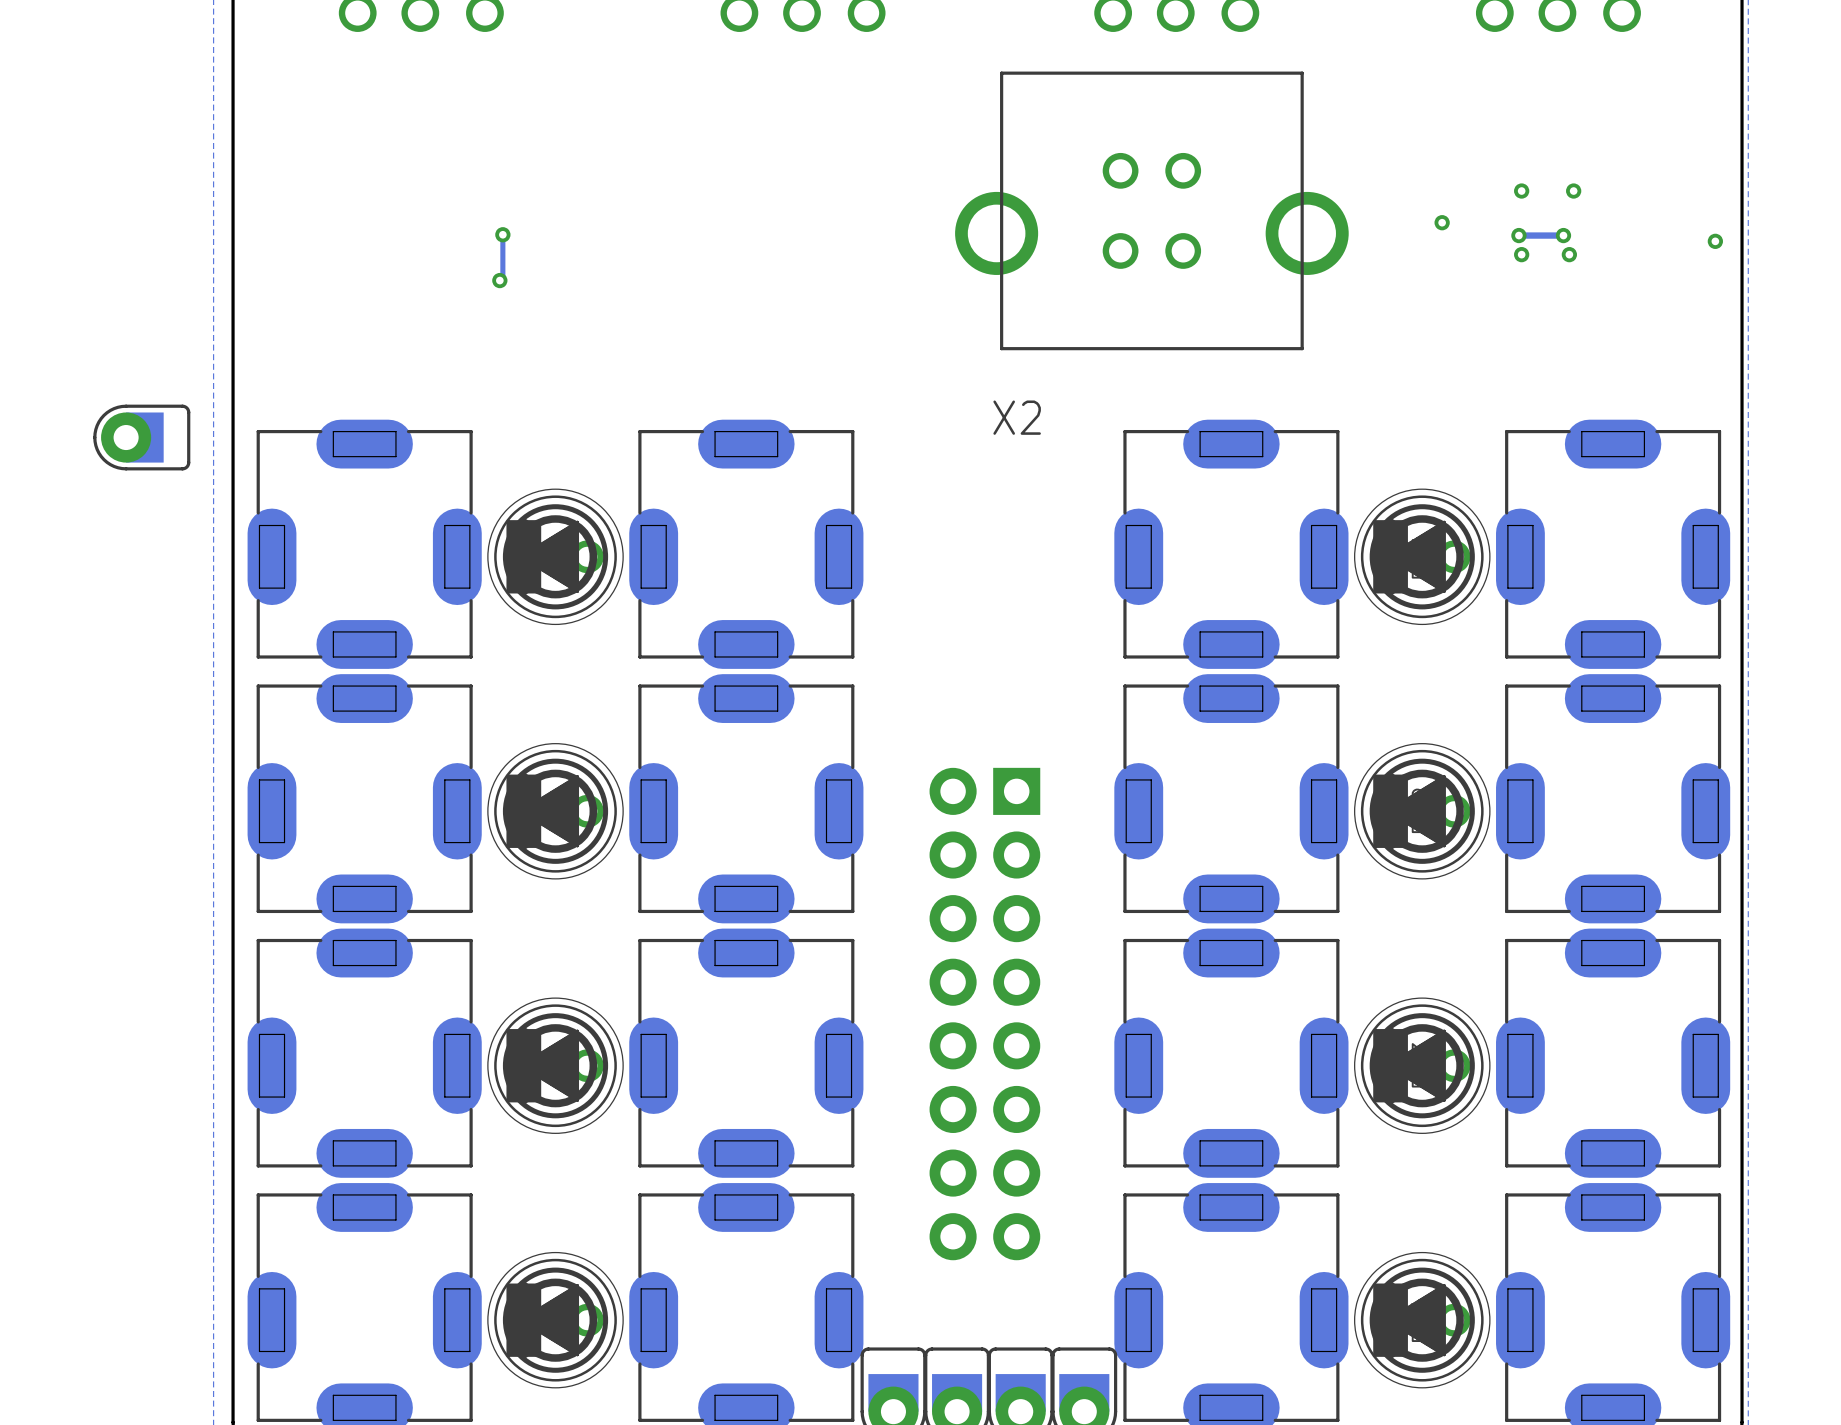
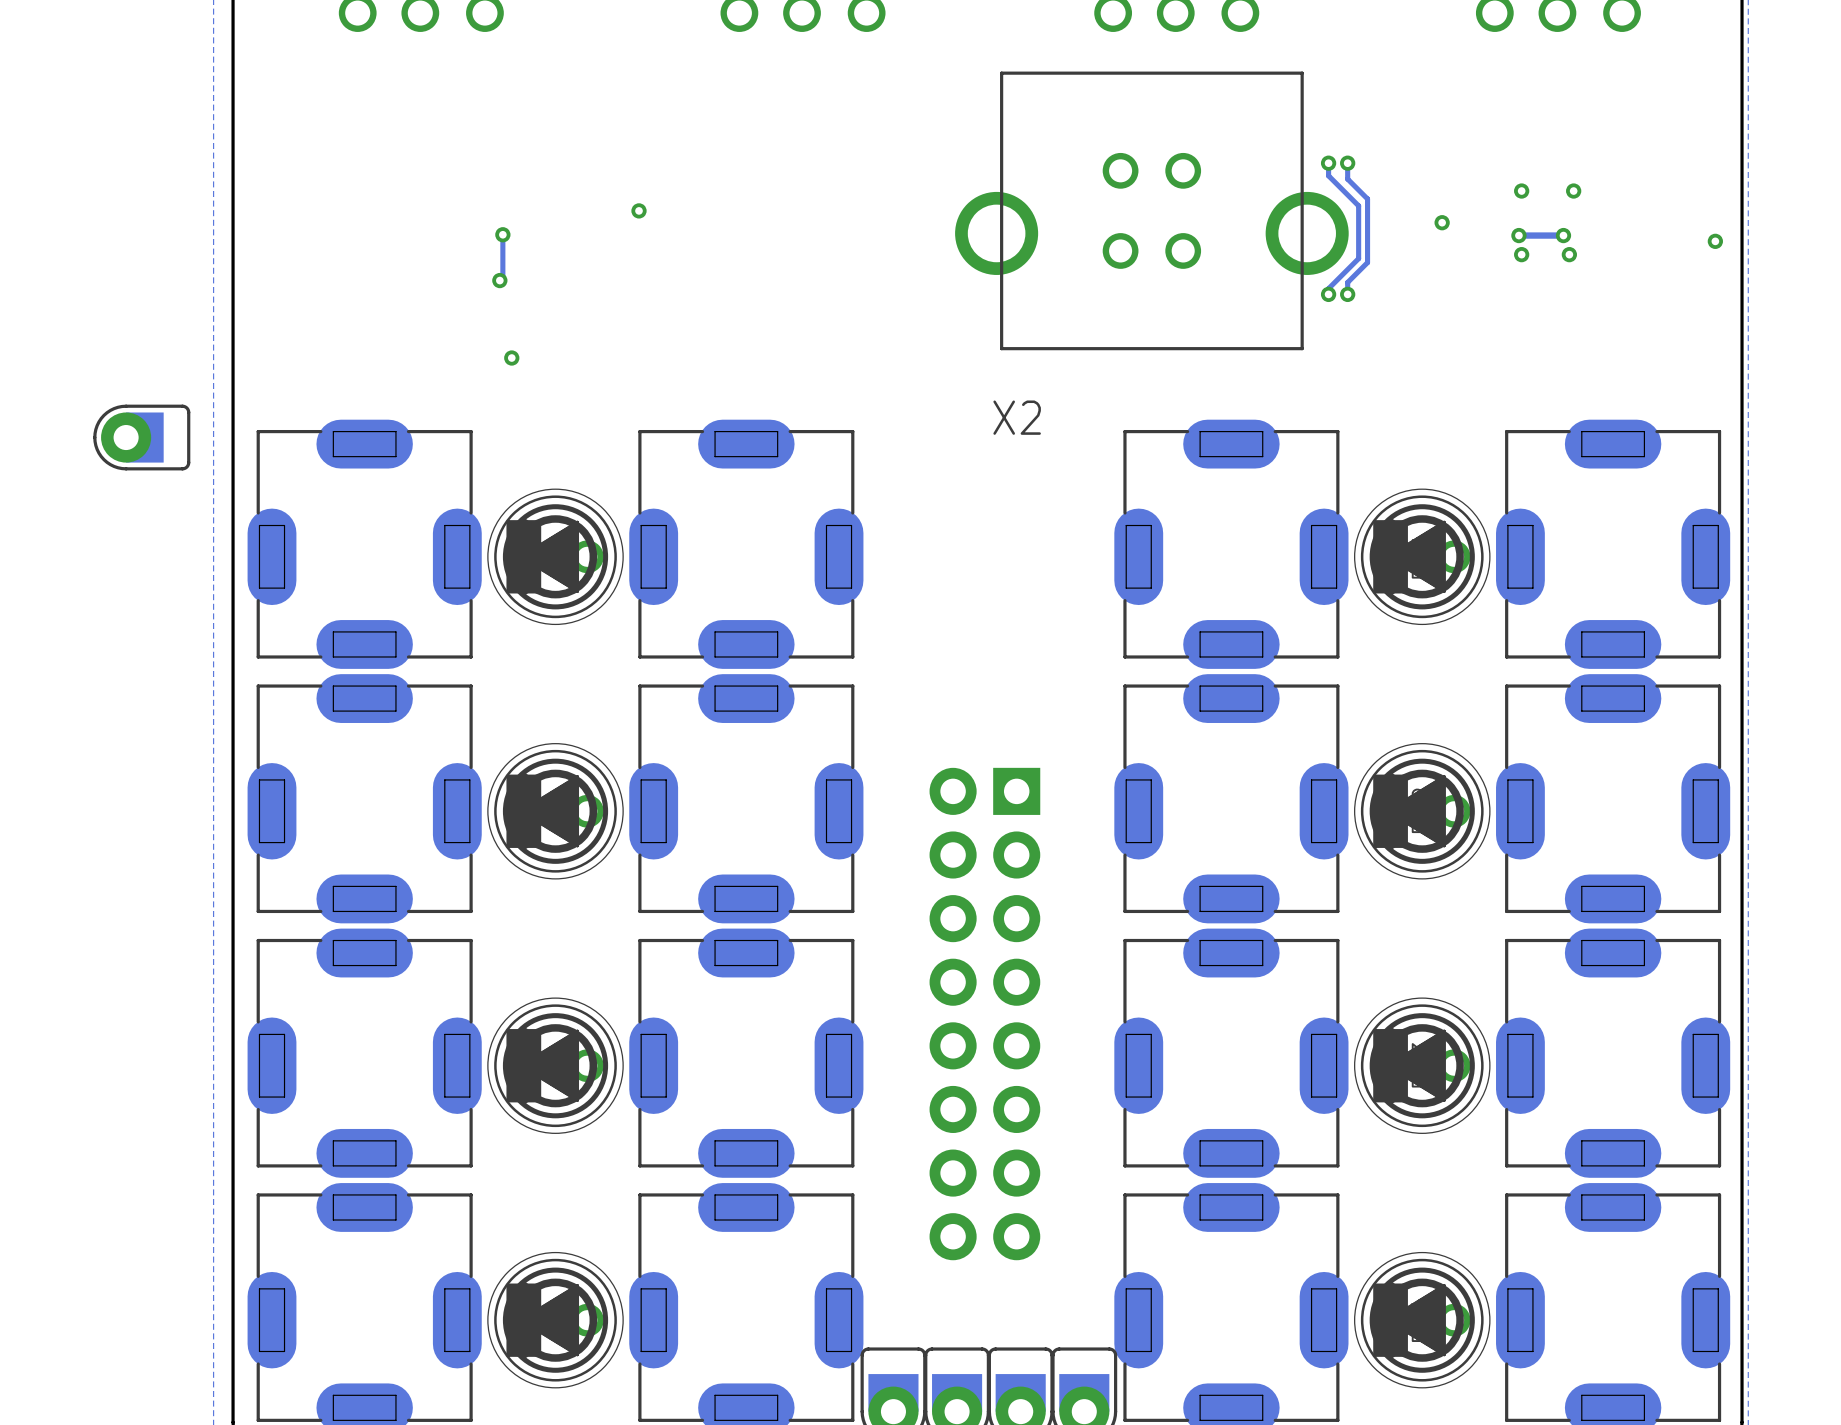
track: none -> (1328, 163) (1328, 175) (1358, 205) (1358, 258) (1328, 288) (1328, 294)
via: none -> (1328, 163)
track: none -> (1347, 163) (1347, 179) (1367, 198) (1367, 262) (1347, 282) (1347, 294)
via: none -> (1347, 163)
via: none -> (639, 210)
via: none -> (1328, 294)
via: none -> (1347, 294)
via: none -> (511, 358)

